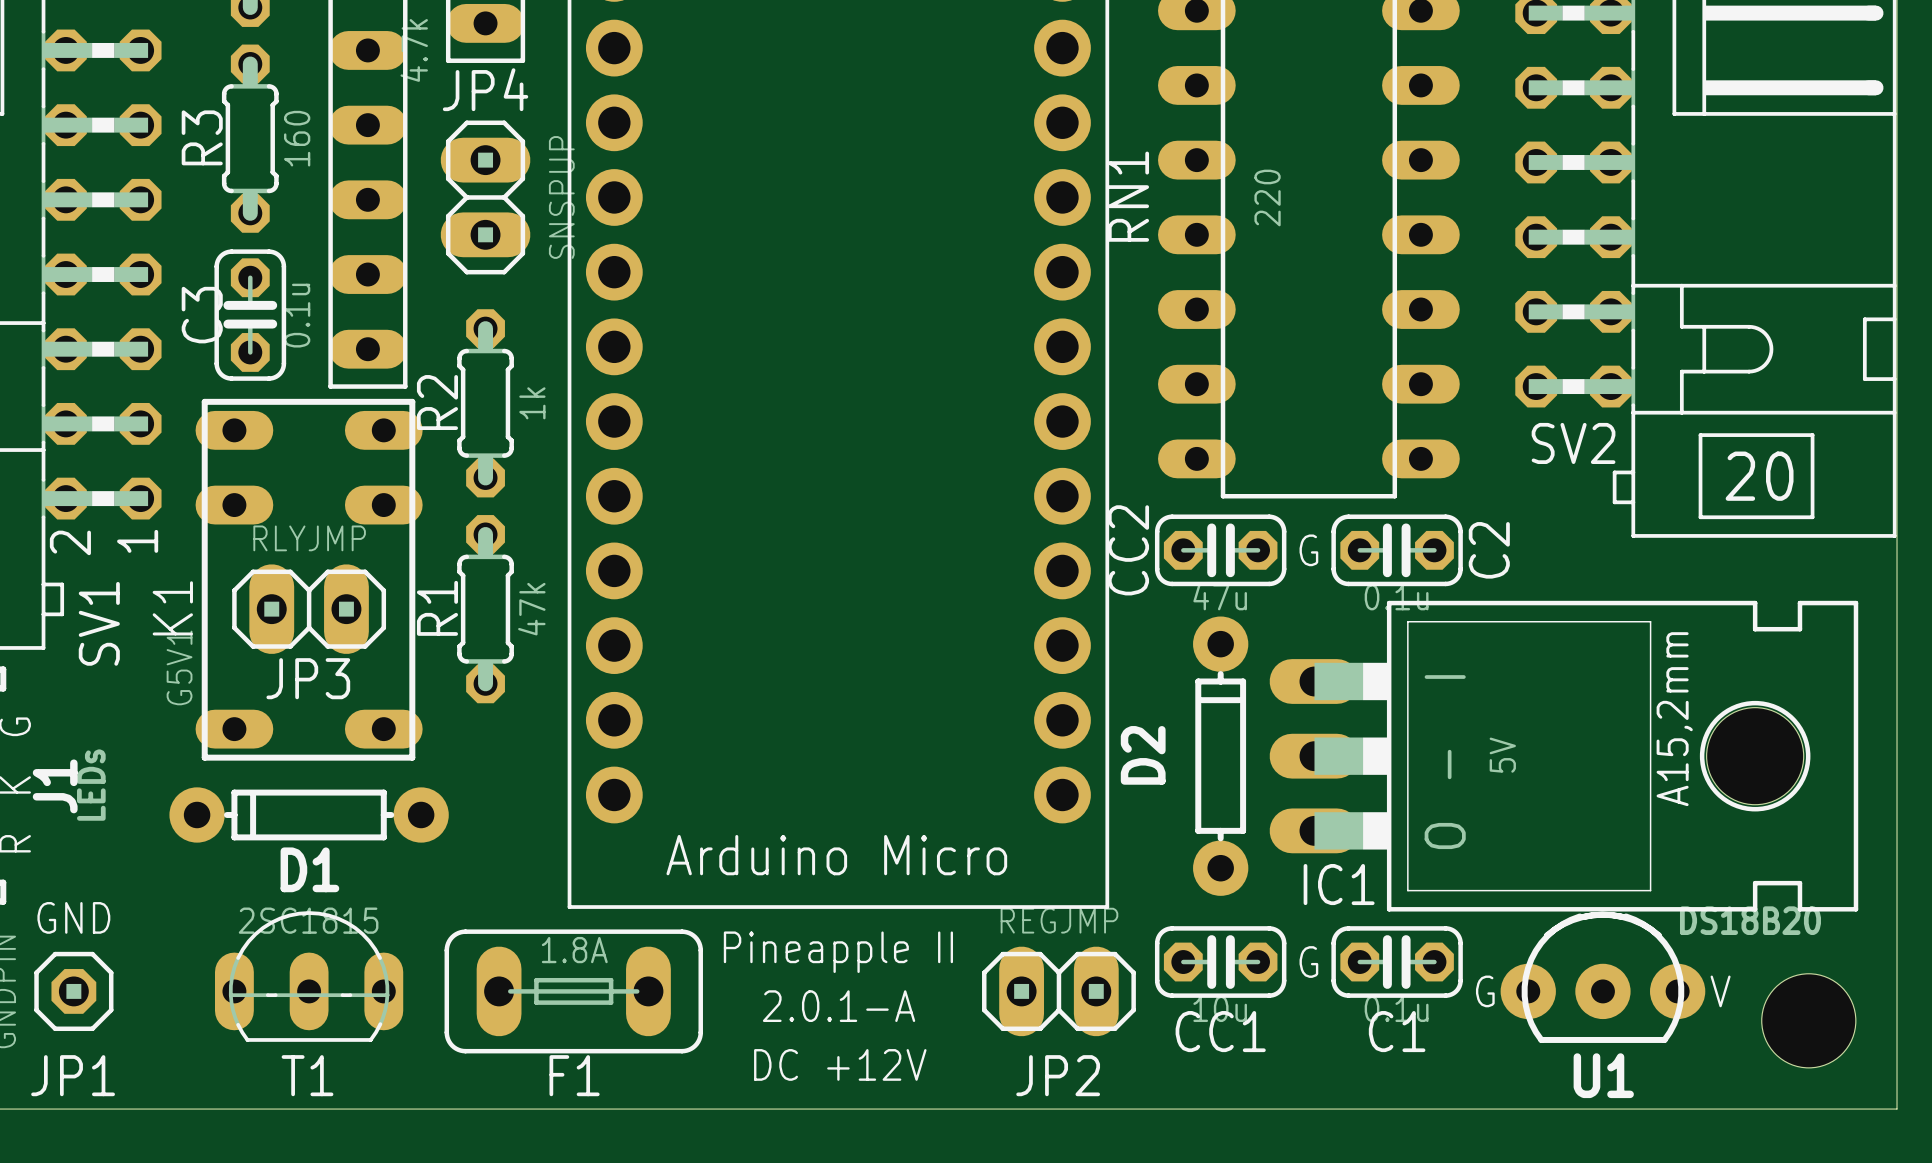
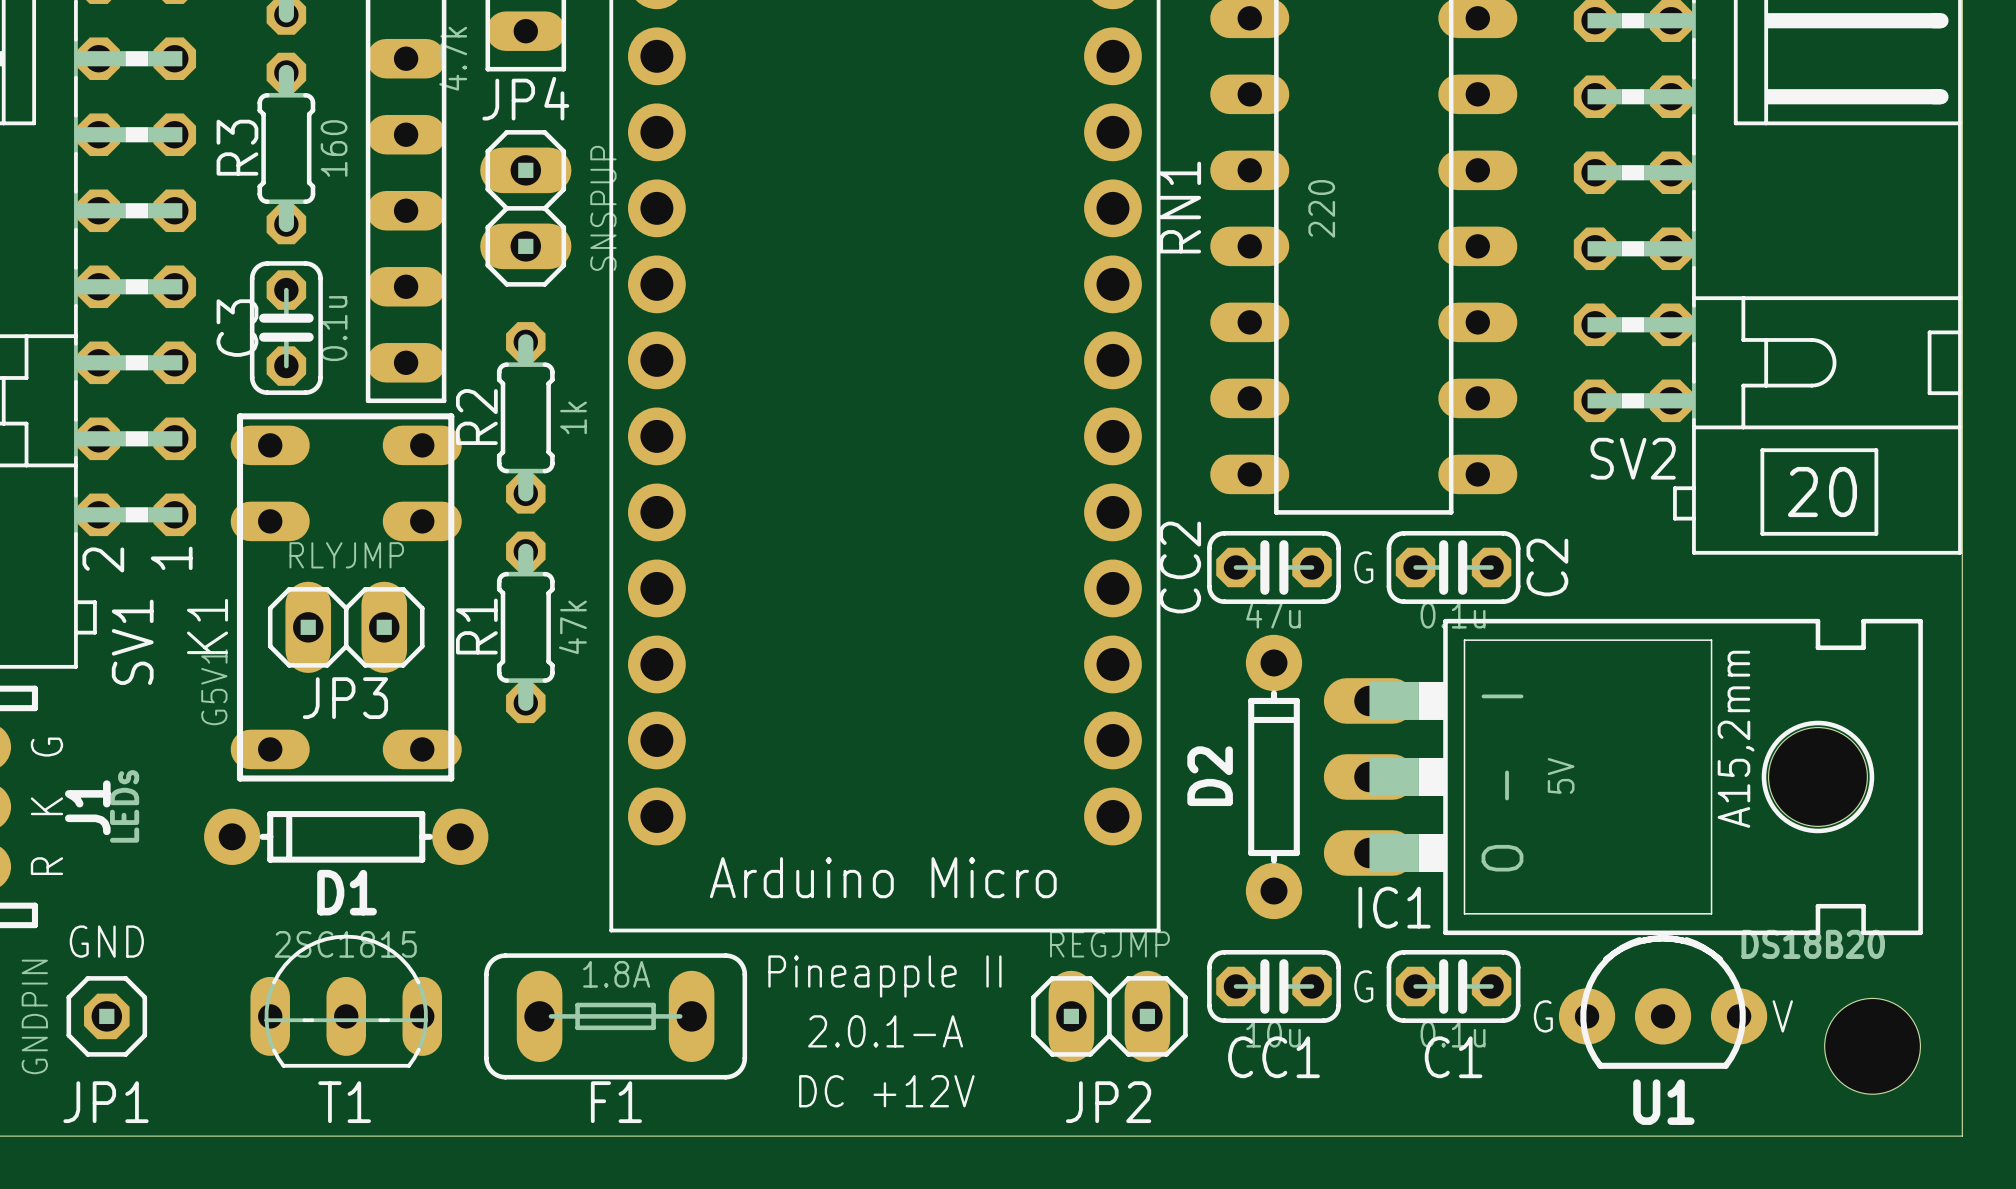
D2 name position: D2 (1143, 755) -> D2 (1210, 776)

